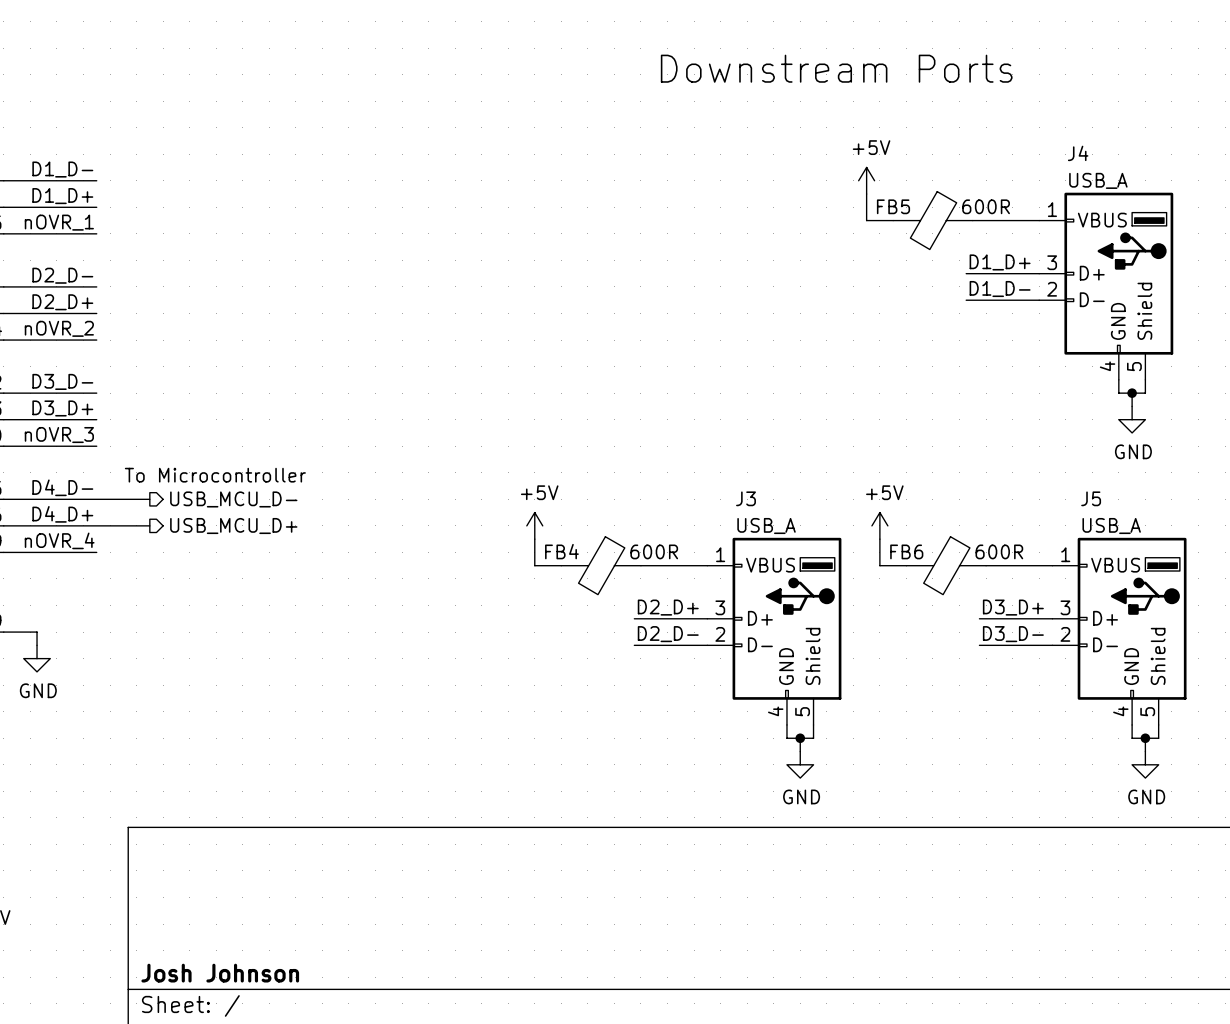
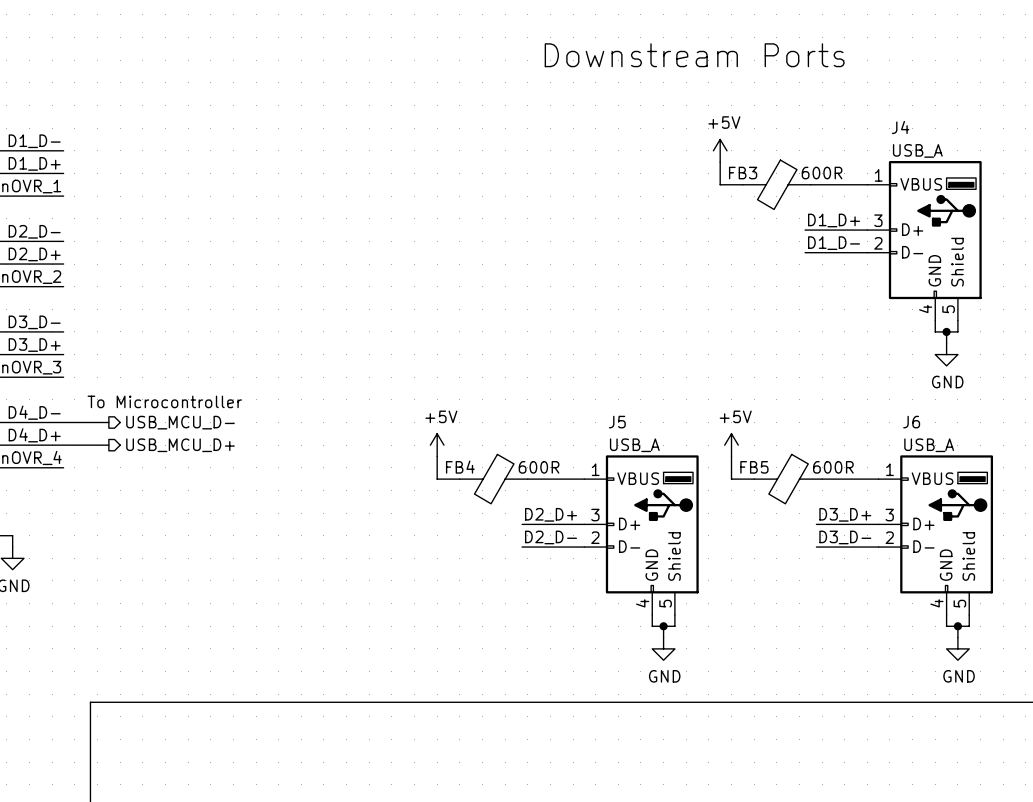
FB5 name: FB5 (893, 206) -> FB3 (743, 173)
J3 name: J3 (745, 498) -> J5 (617, 422)
J5 name: J5 (1091, 498) -> J6 (911, 422)
FB6 name: FB6 (906, 551) -> FB5 (754, 467)

